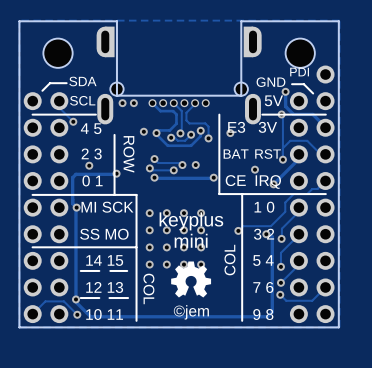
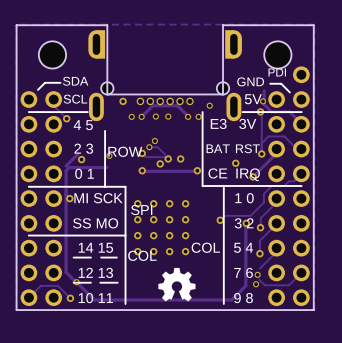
via: (285, 91) -> none
via: (122, 103) -> none
track: (152, 103) (160, 111) (173, 111) (176, 114) (176, 123) (169, 130) (159, 130) (156, 133) (167, 145) (191, 145) (200, 136) (200, 130) -> none
track: (195, 103) (186, 112) (186, 120) (189, 123) (205, 123) (208, 126) (208, 138) -> none
via: none -> (263, 101)
track: (173, 104) (181, 111) (180, 133) -> none
via: none -> (209, 105)
via: none -> (131, 116)
via: none -> (141, 116)
via: none -> (155, 116)
via: none -> (168, 116)
track: none -> (188, 116) (177, 105) (152, 105) (141, 116)
via: none -> (188, 116)
via: none -> (198, 116)
via: (200, 130) -> none
via: (143, 131) -> none
via: (156, 133) -> none
via: (180, 133) -> none
via: (230, 133) -> none
track: (191, 134) (185, 140) (177, 140) (174, 137) (171, 137) -> none
via: (191, 134) -> none
via: (171, 137) -> none
via: (208, 138) -> none
via: none -> (154, 141)
track: none -> (149, 147) (157, 147) (165, 154)
via: none -> (149, 147)
text rotation: 0° (128, 154) -> 90° counterclockwise (125, 151)
track: none -> (77, 154) (66, 165)
via: none -> (109, 155)
track: (149, 168) (153, 170) (173, 170) -> none
via: (149, 168) -> none
via: (116, 173) -> none
track: none -> (66, 194) (66, 272) (94, 300) (231, 300) (245, 285) (245, 226)
track: (75, 211) (75, 302) (90, 316) (267, 316) (272, 312) (272, 236) (266, 234) -> none
text: none -> SPI (141, 210)
text: keyplus (191, 221) -> none
text: mini (191, 240) -> none
text rotation: 0° (229, 260) -> 90° clockwise (205, 247)
drawing position: (191, 279) -> (176, 284)
via: (280, 282) -> none
text rotation: 0° (148, 288) -> 90° counterclockwise (142, 255)
via: none -> (257, 274)
via: (280, 294) -> none
via: none -> (76, 282)
via: (75, 299) -> none
via: none -> (256, 284)
text: ©jem (191, 312) -> none

